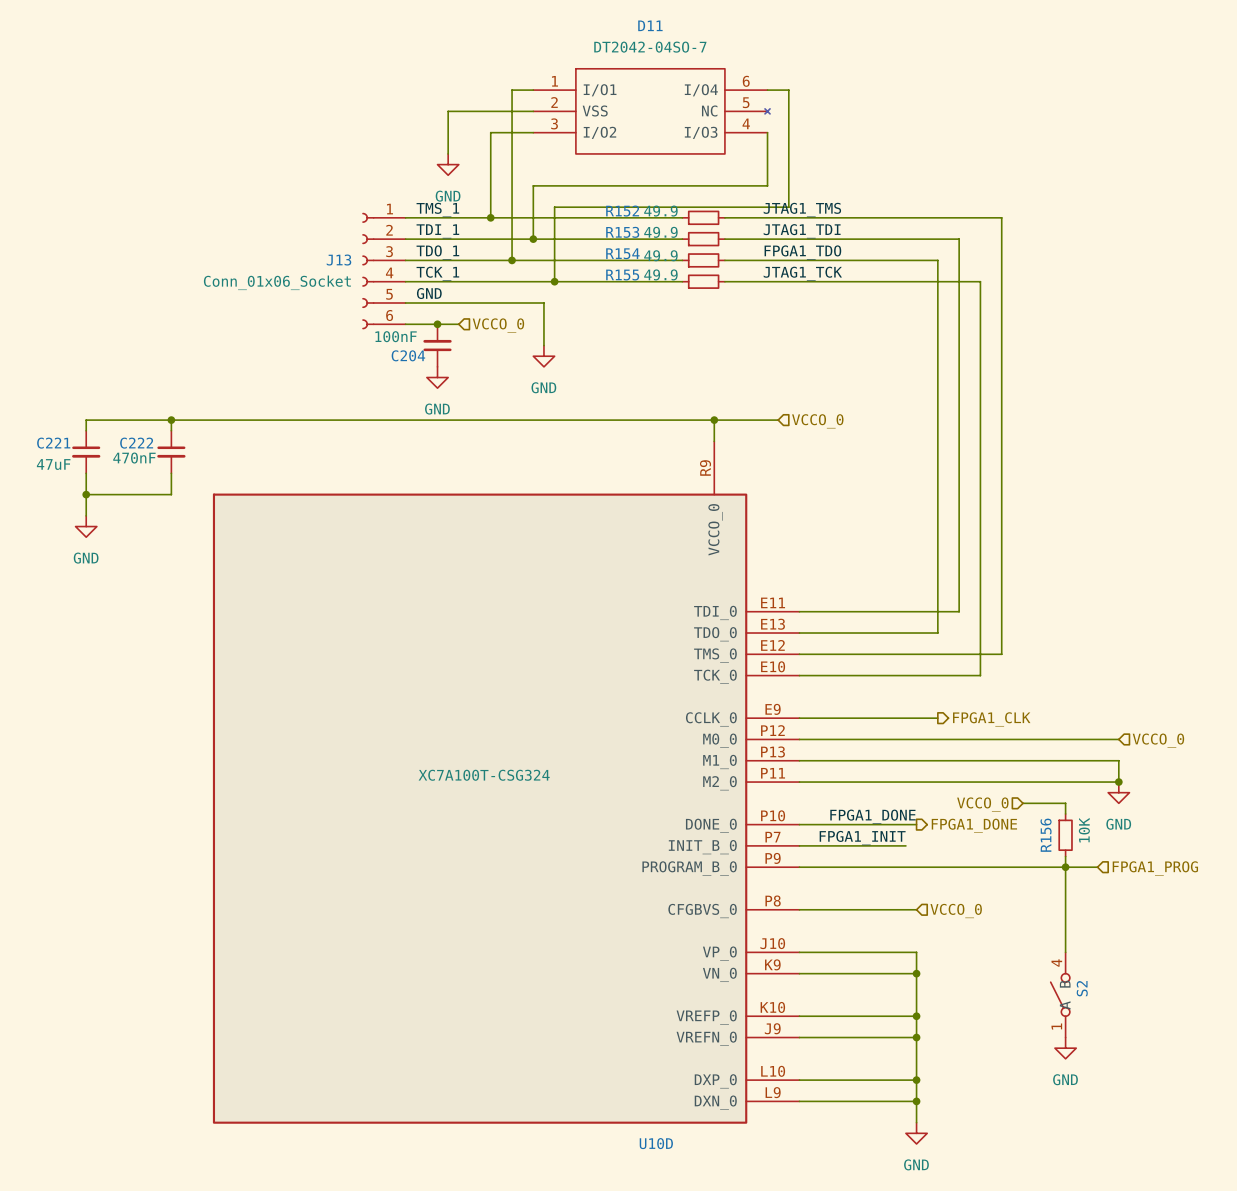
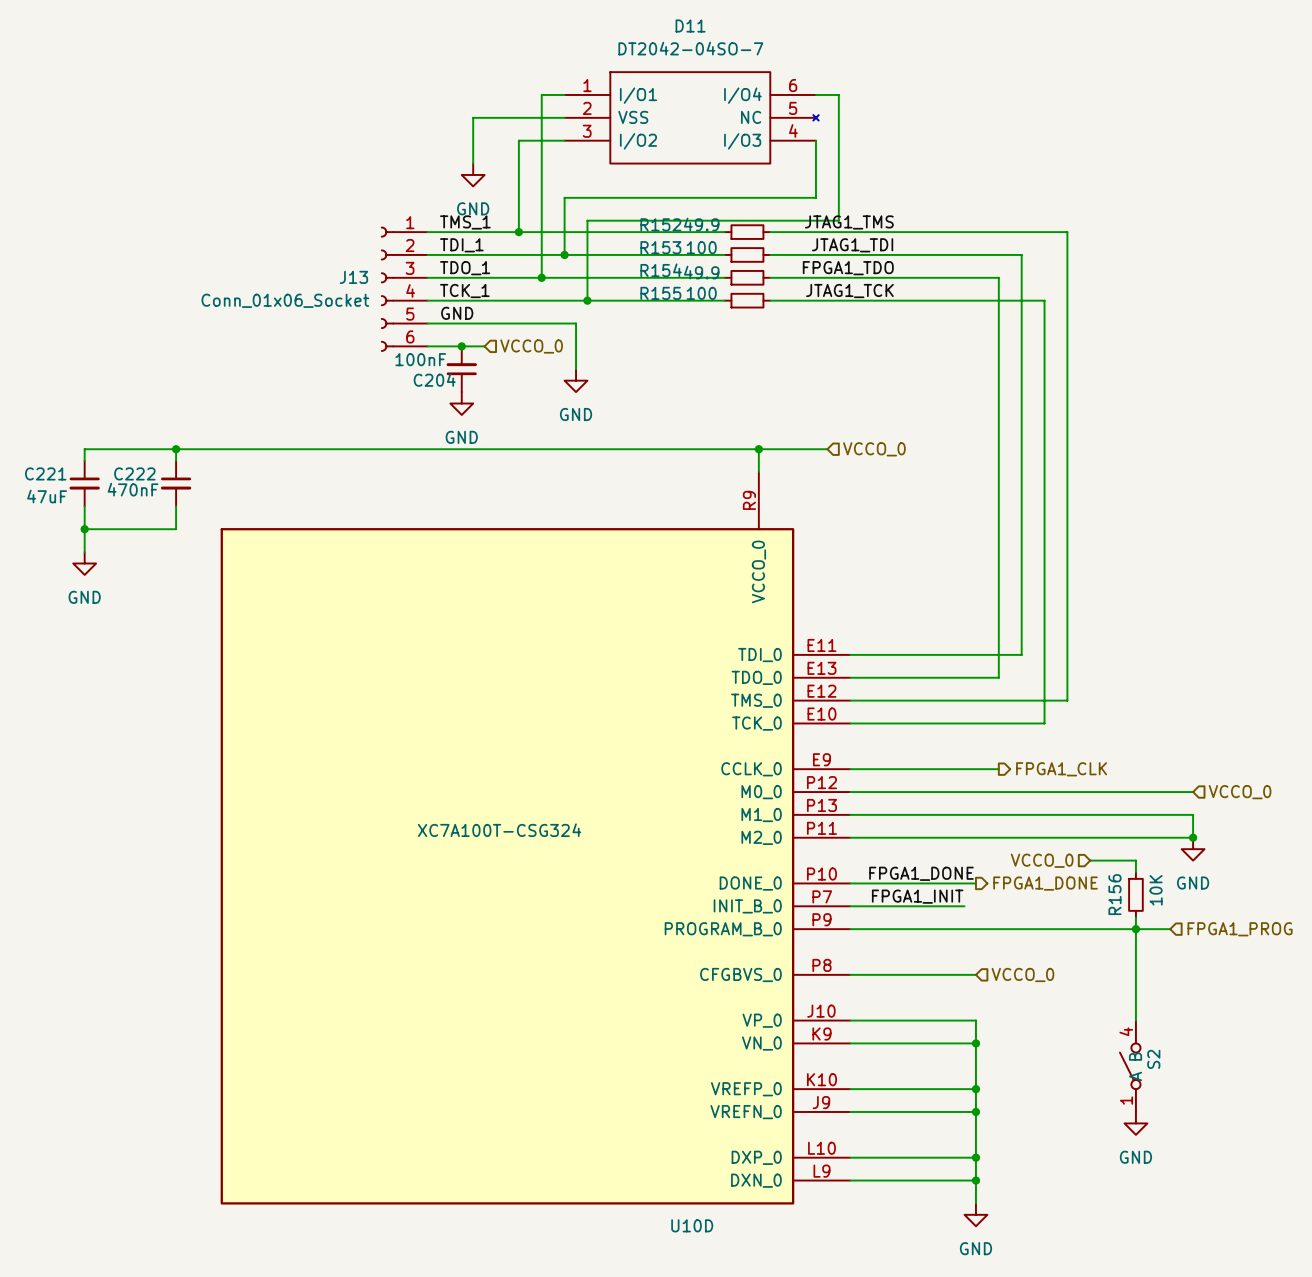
R153 value: 49.9 (660, 232) -> 100 (701, 247)
R155 value: 49.9 (660, 274) -> 100 (701, 293)

